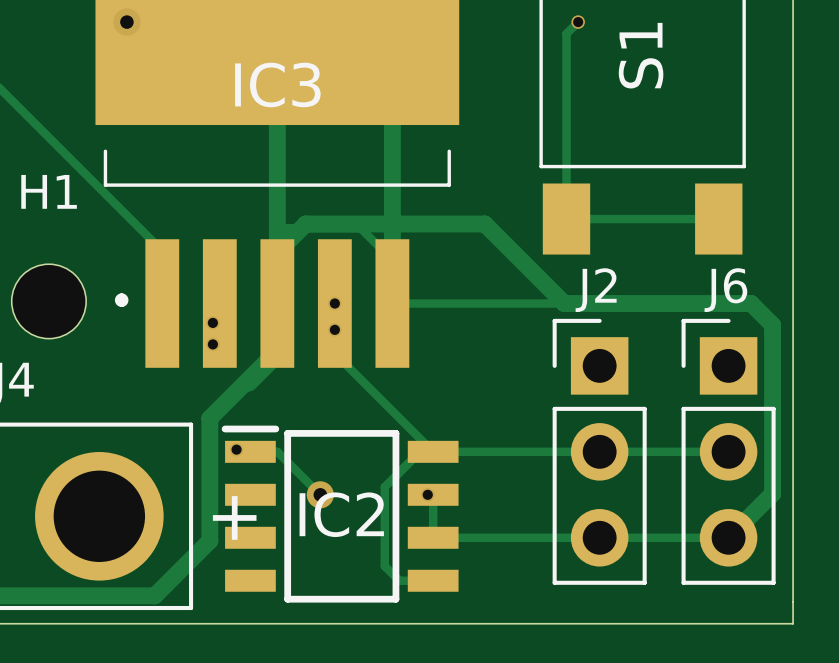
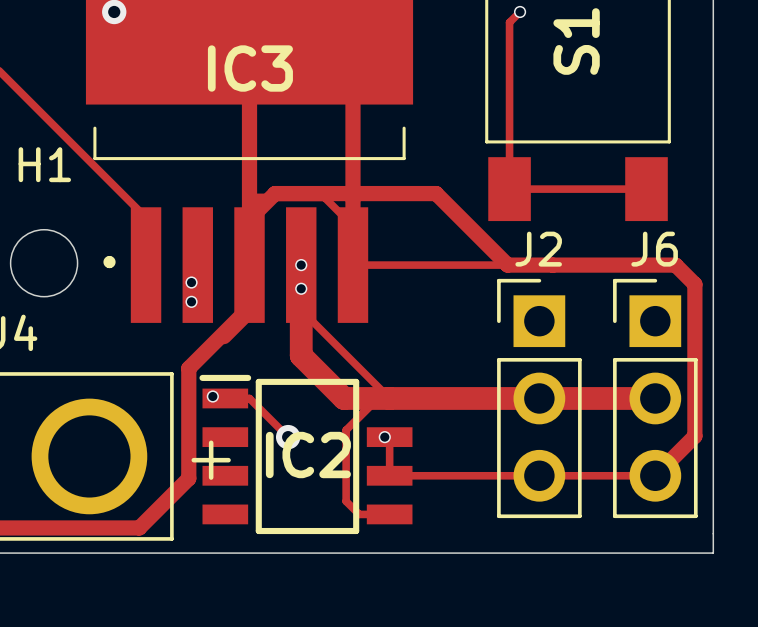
track: none -> (301, 265) (301, 355) (344, 398) (389, 398)
track width: thin (433, 451) (728, 451) -> thick (389, 398) (655, 398)

